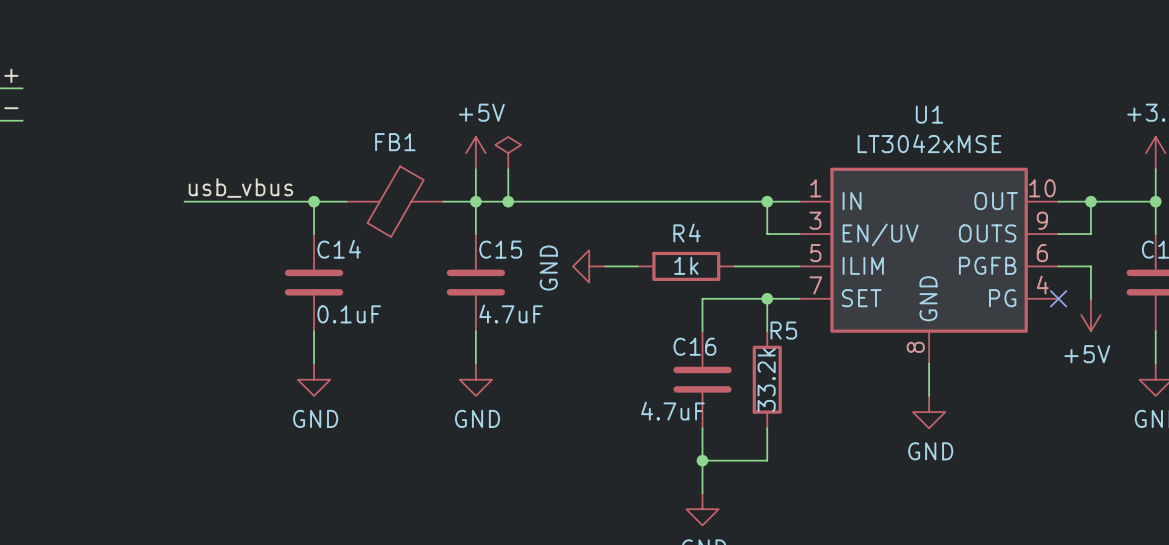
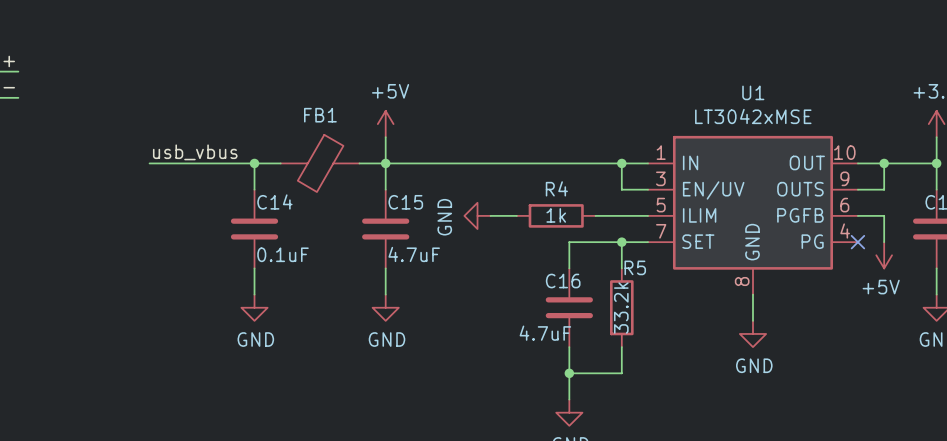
power symbol: (508, 153) -> none
wire: (508, 169) (508, 201) -> none
junction: (508, 201) -> none

